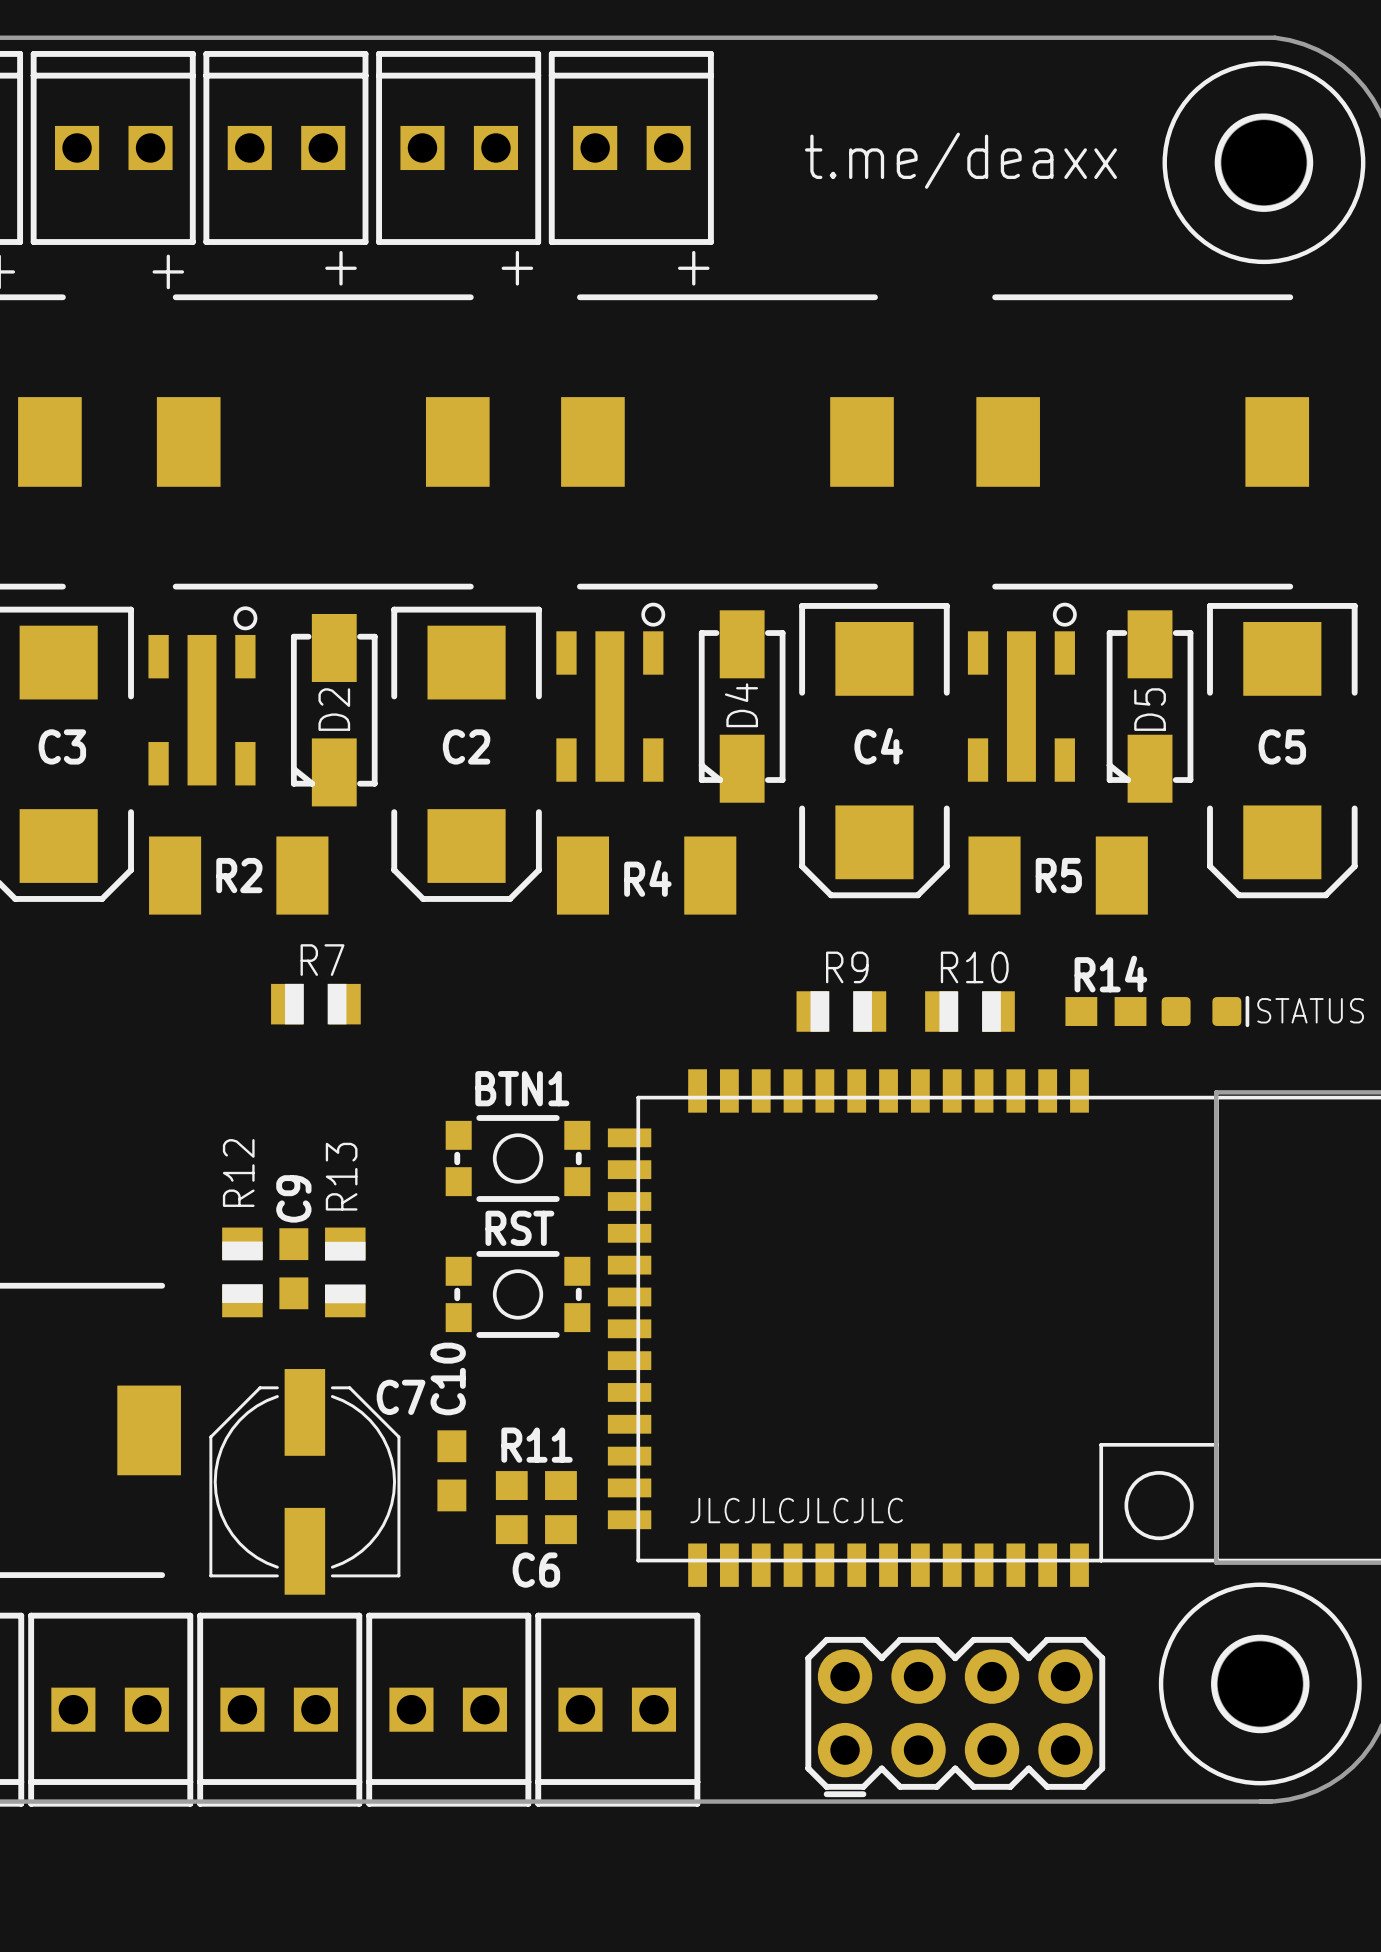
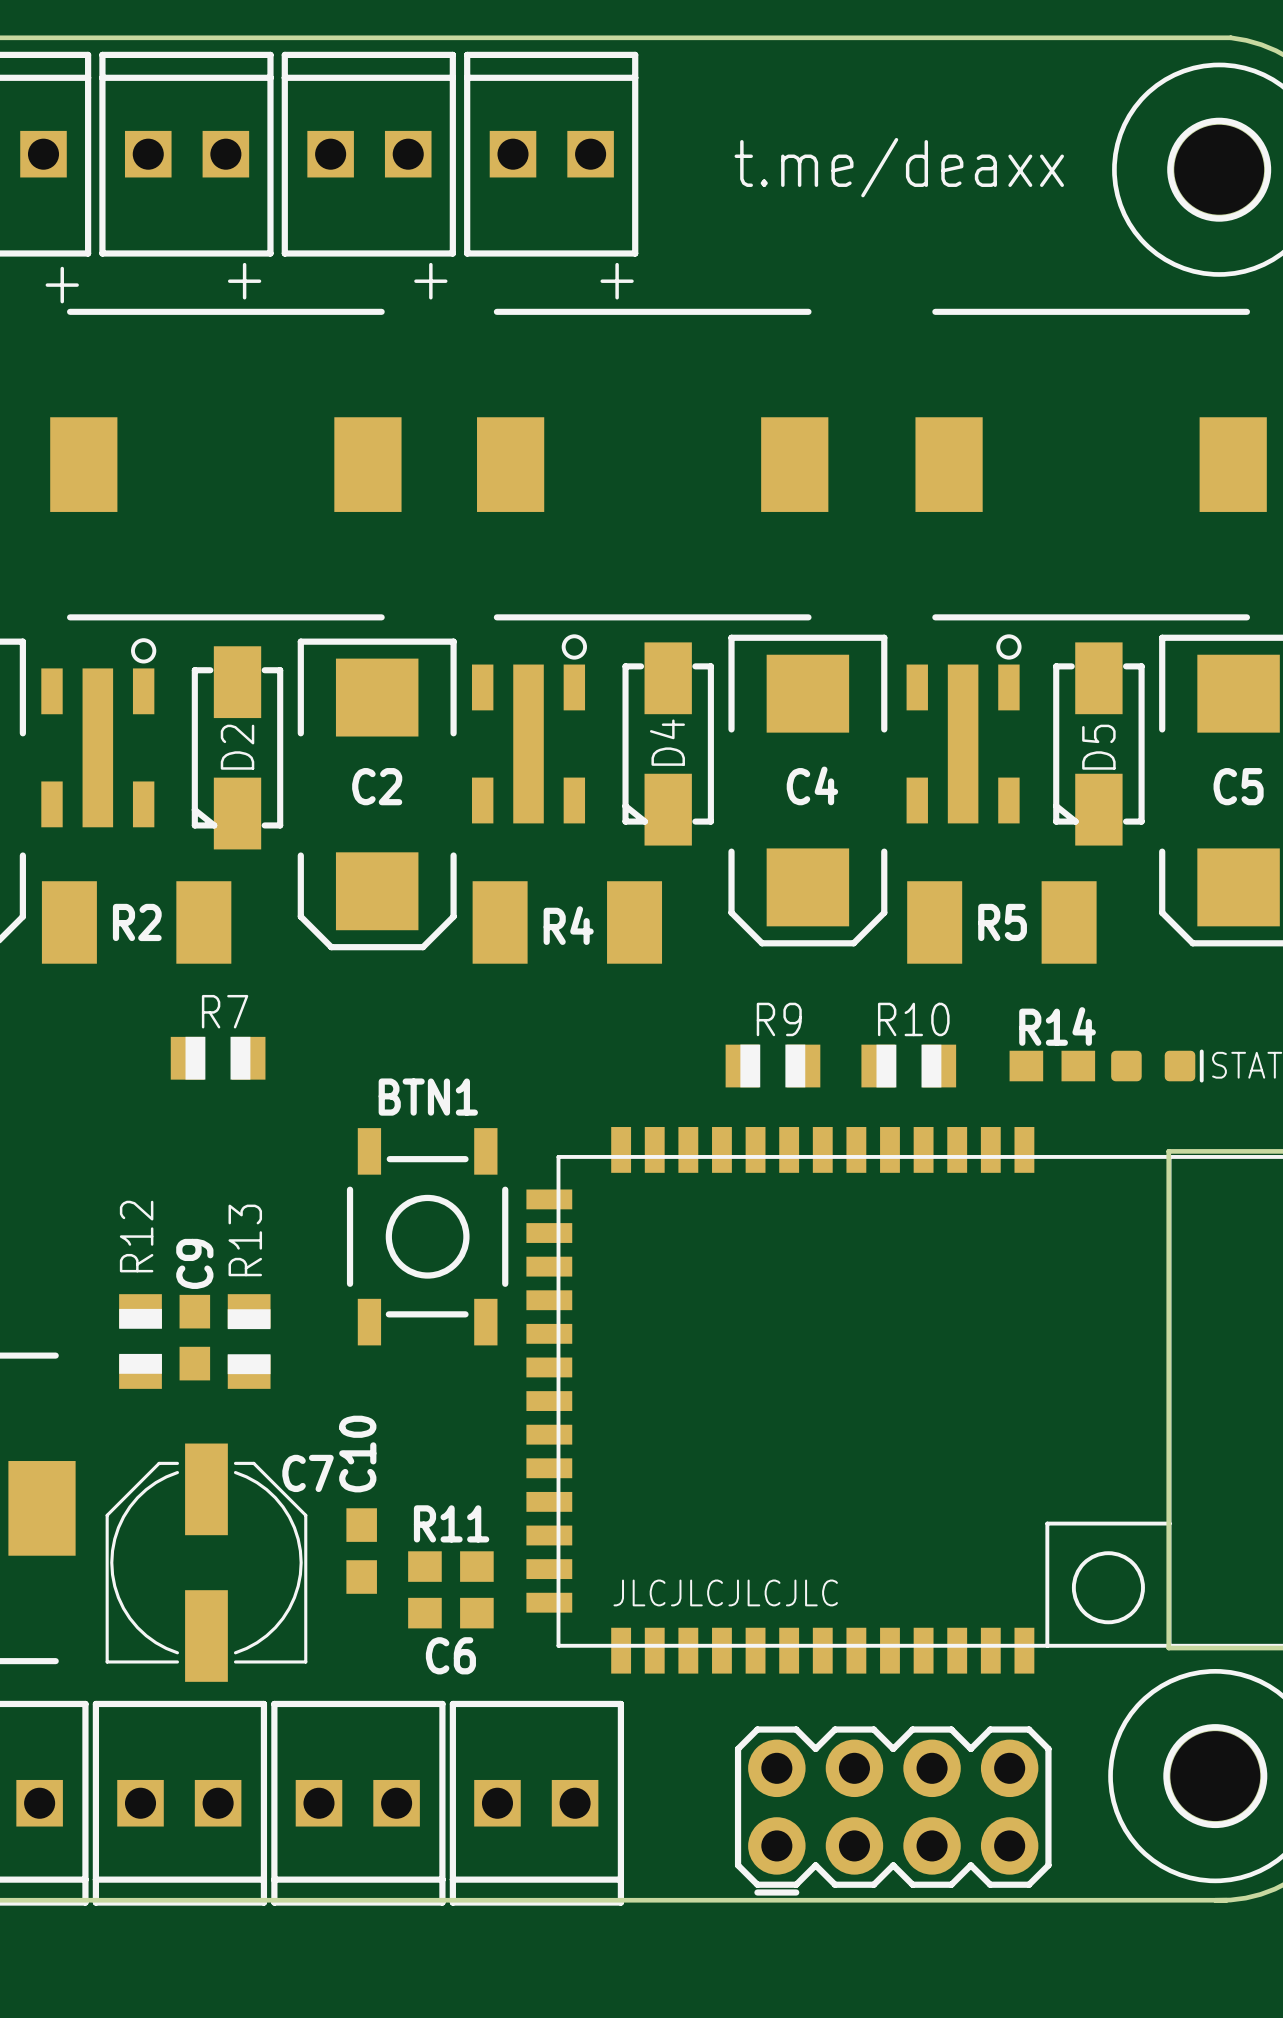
BTN1 name position: BTN1 (522, 1088) -> BTN1 (428, 1097)
BTN1 footprint: [445, 1115, 591, 1202] -> [346, 1128, 509, 1346]
RST: (518, 1294) -> none

